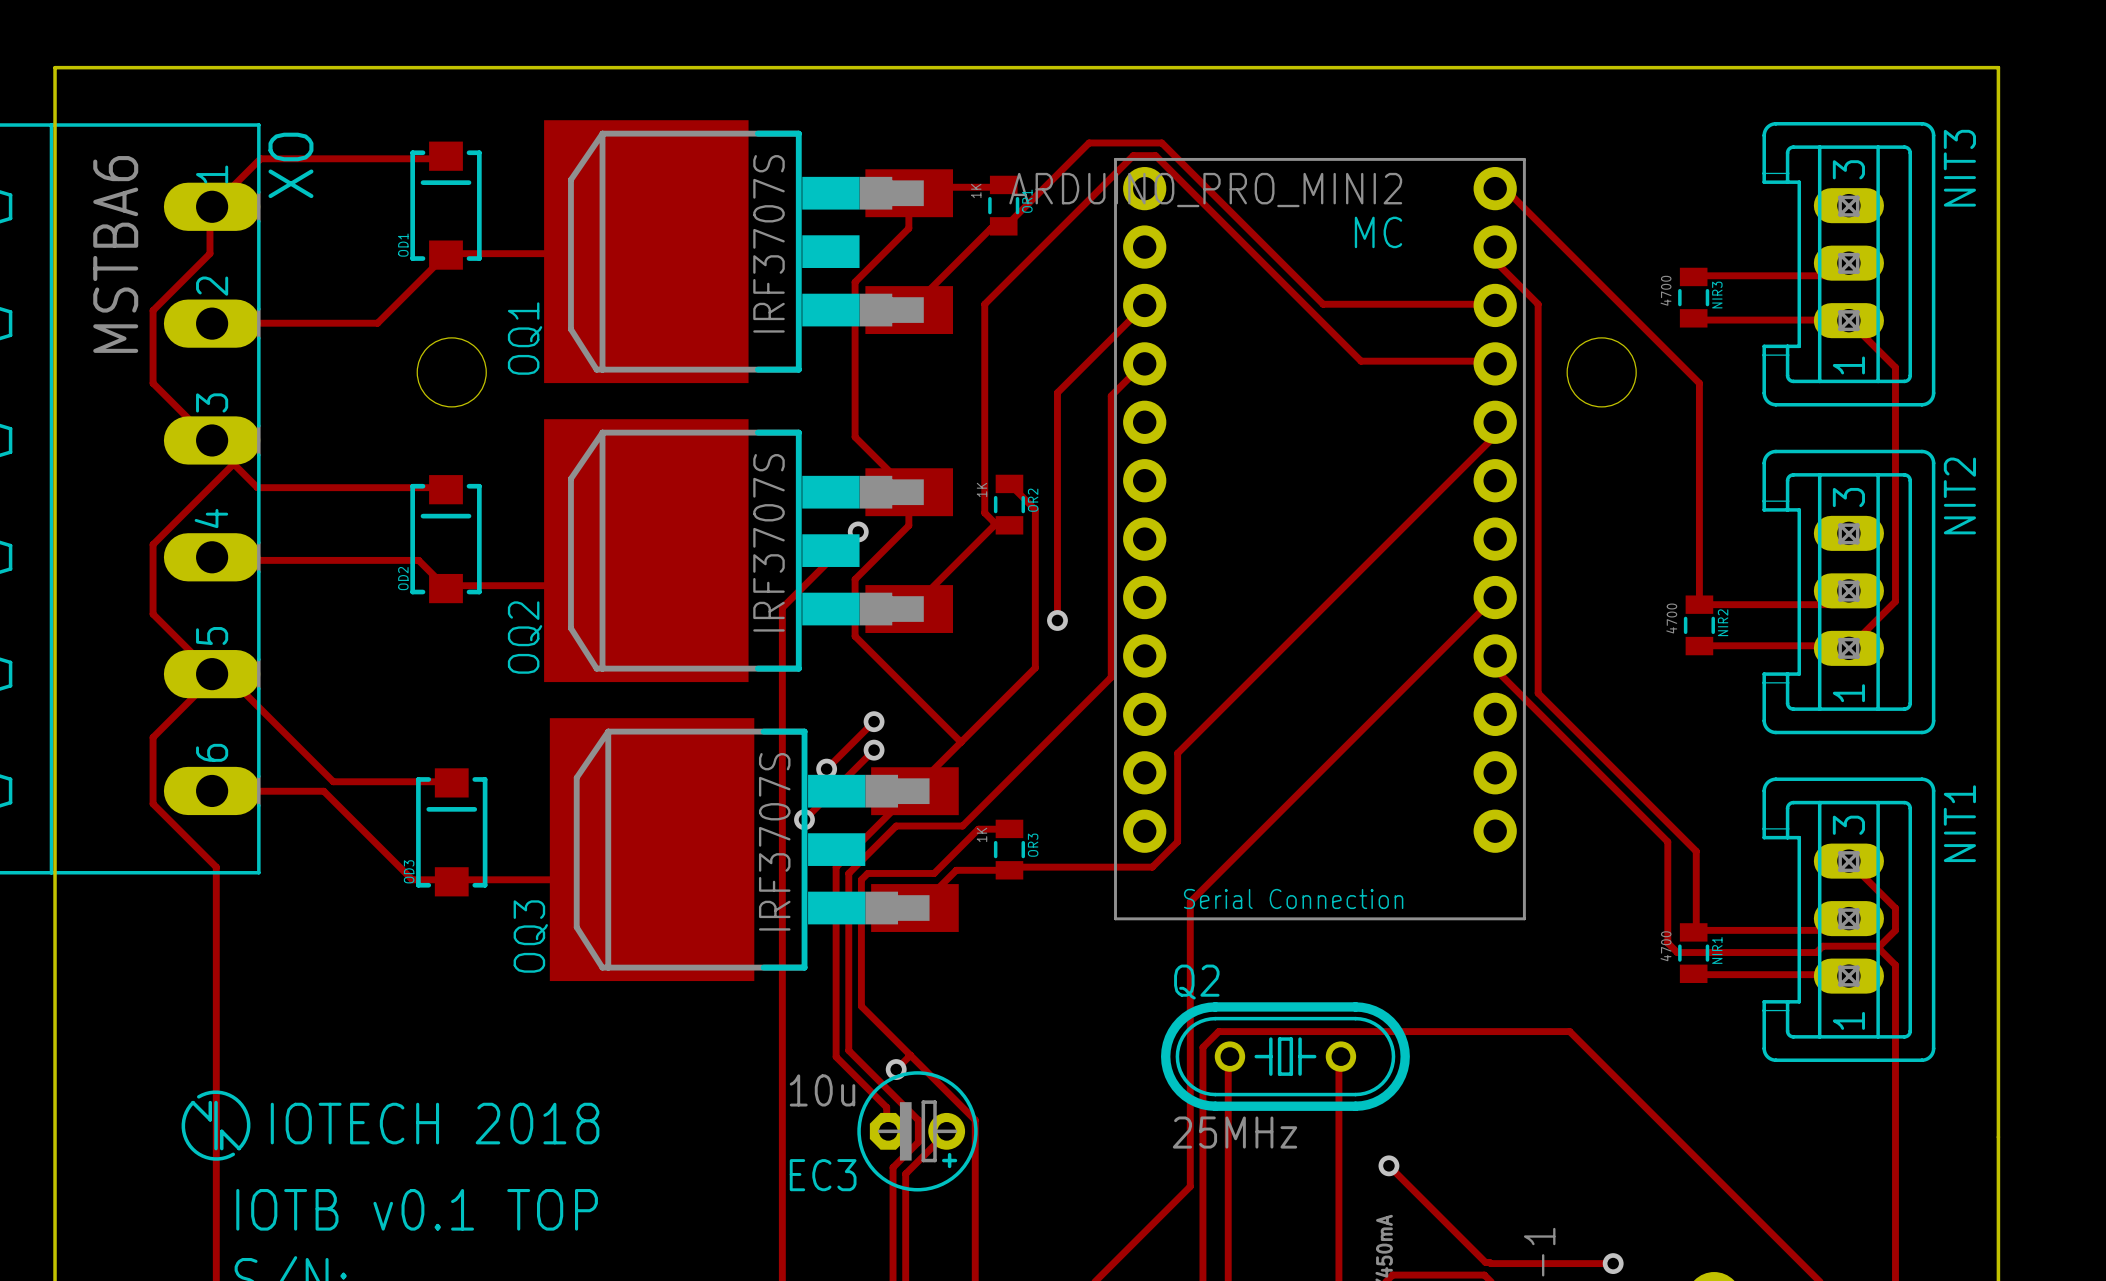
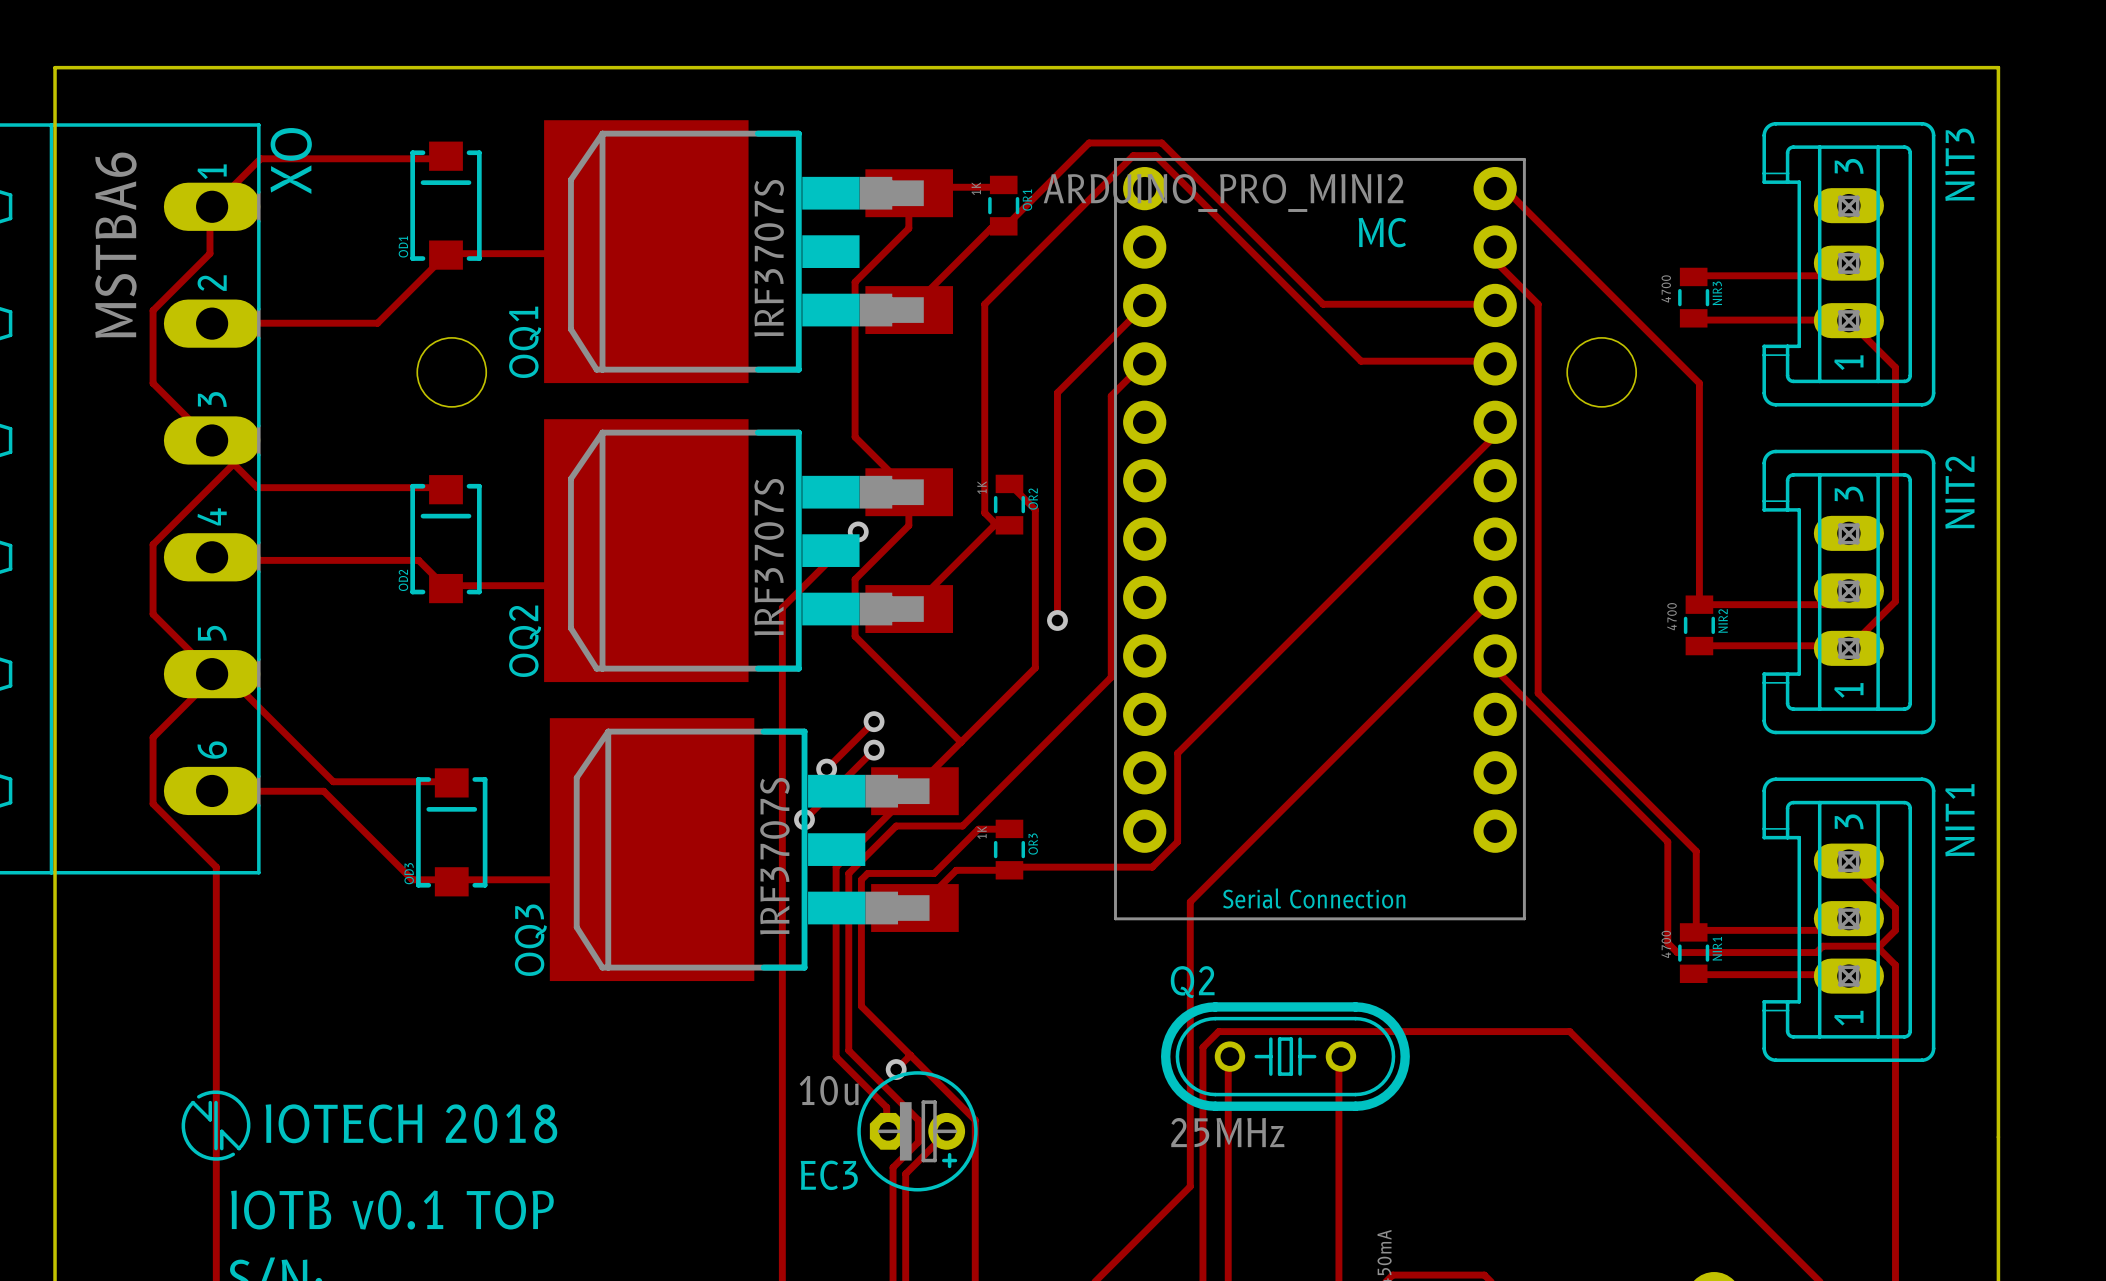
track: (1388, 1165) (1485, 1262) (1613, 1263) -> none
via: (1388, 1165) -> none
via: (1613, 1263) -> none

